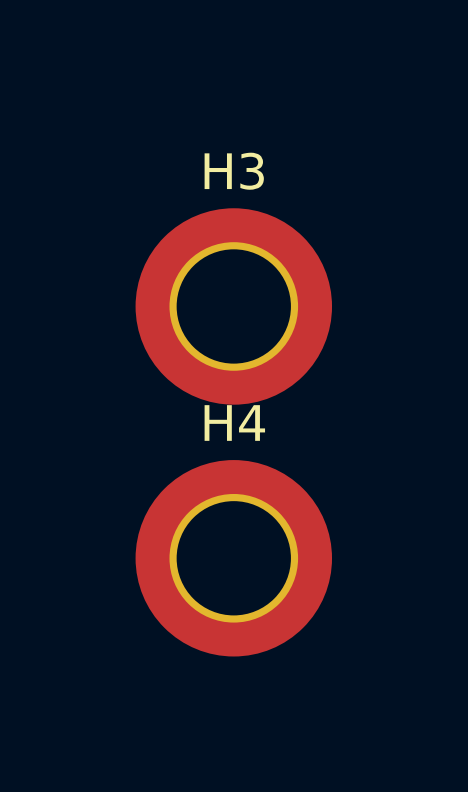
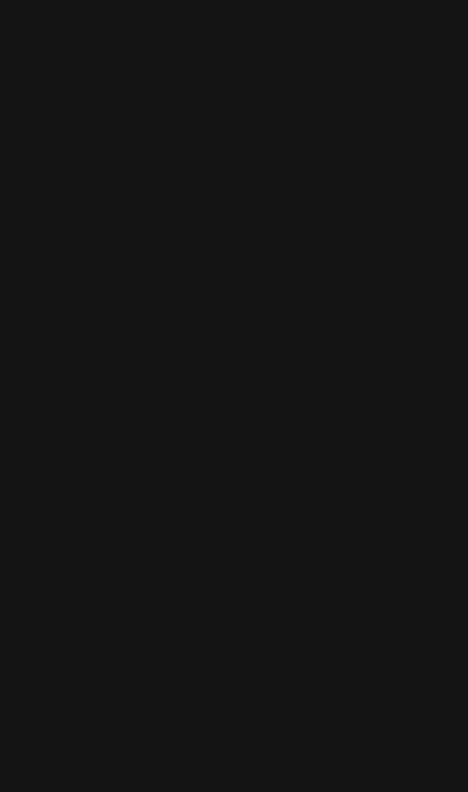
H3: (233, 306) -> none
H4: (233, 558) -> none

